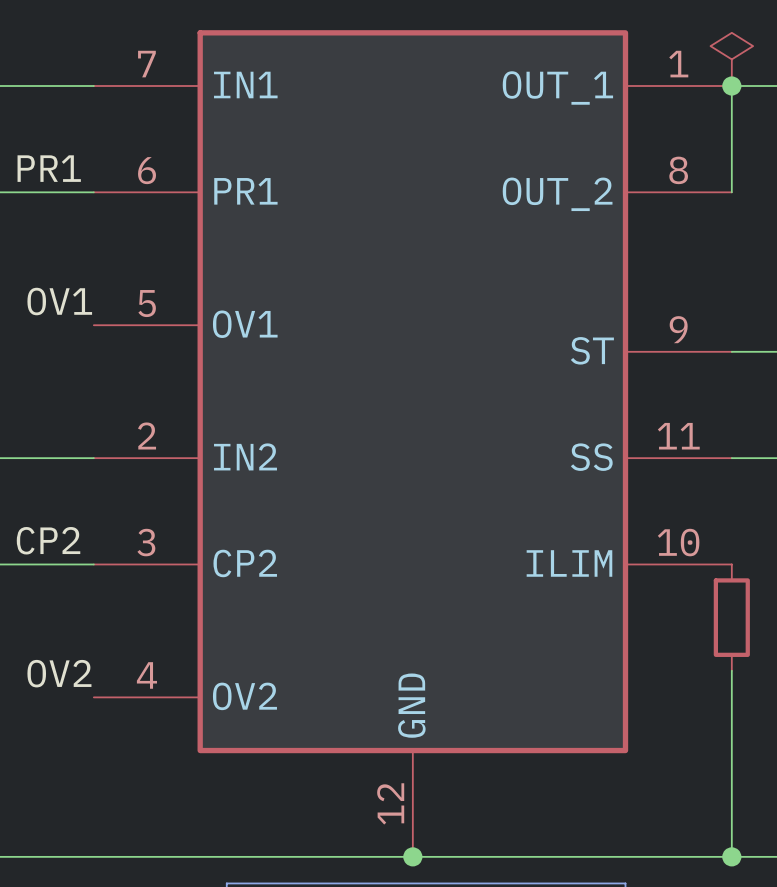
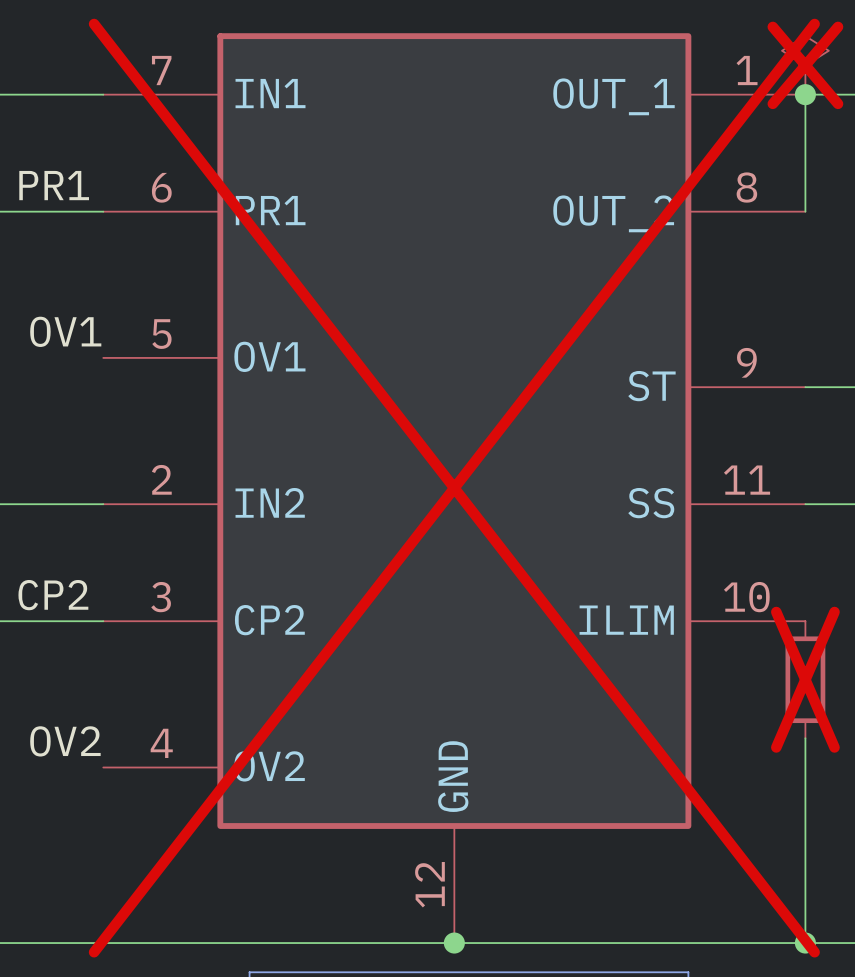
power symbol do-not-place cross: none -> (805, 65)
part do-not-place cross: none -> (454, 488)
part do-not-place cross: none -> (805, 679)

